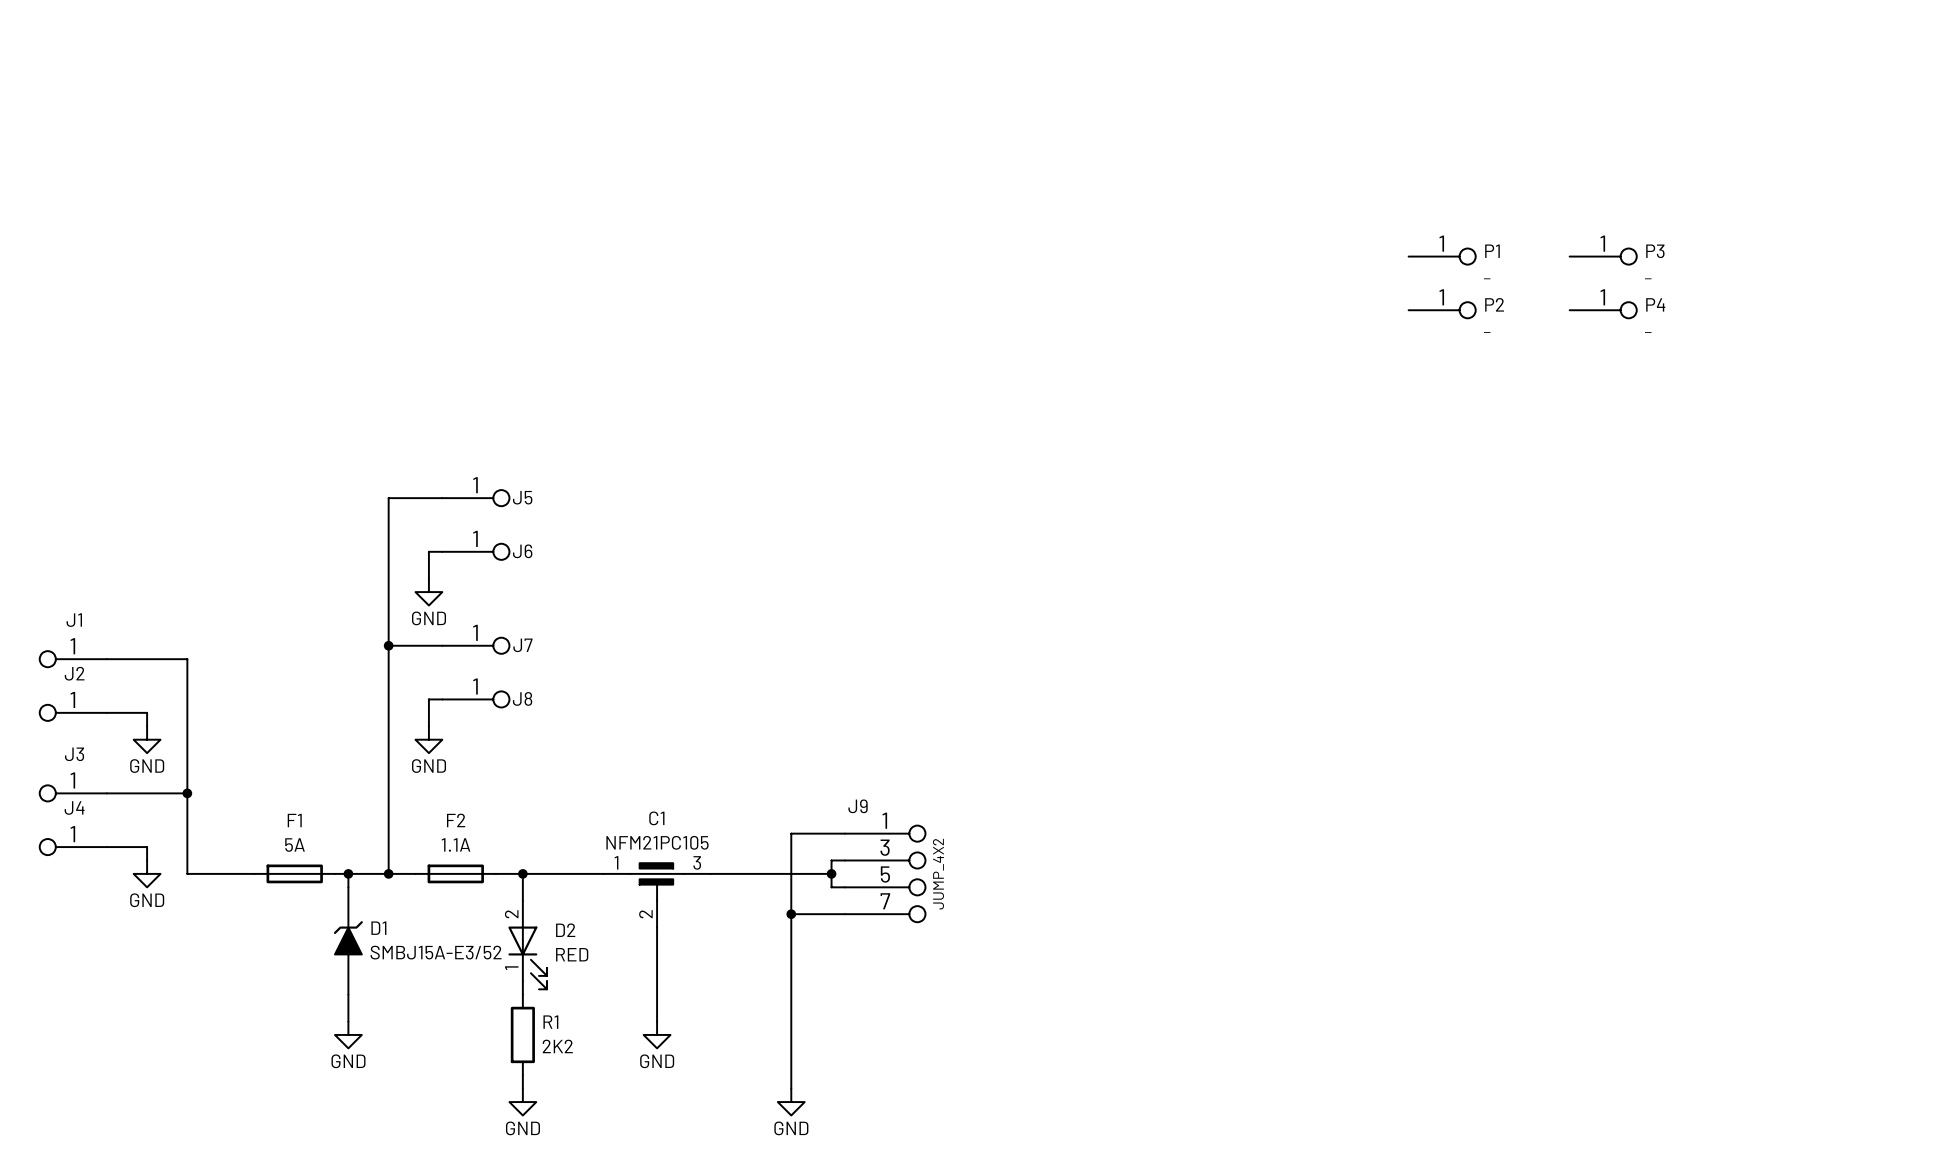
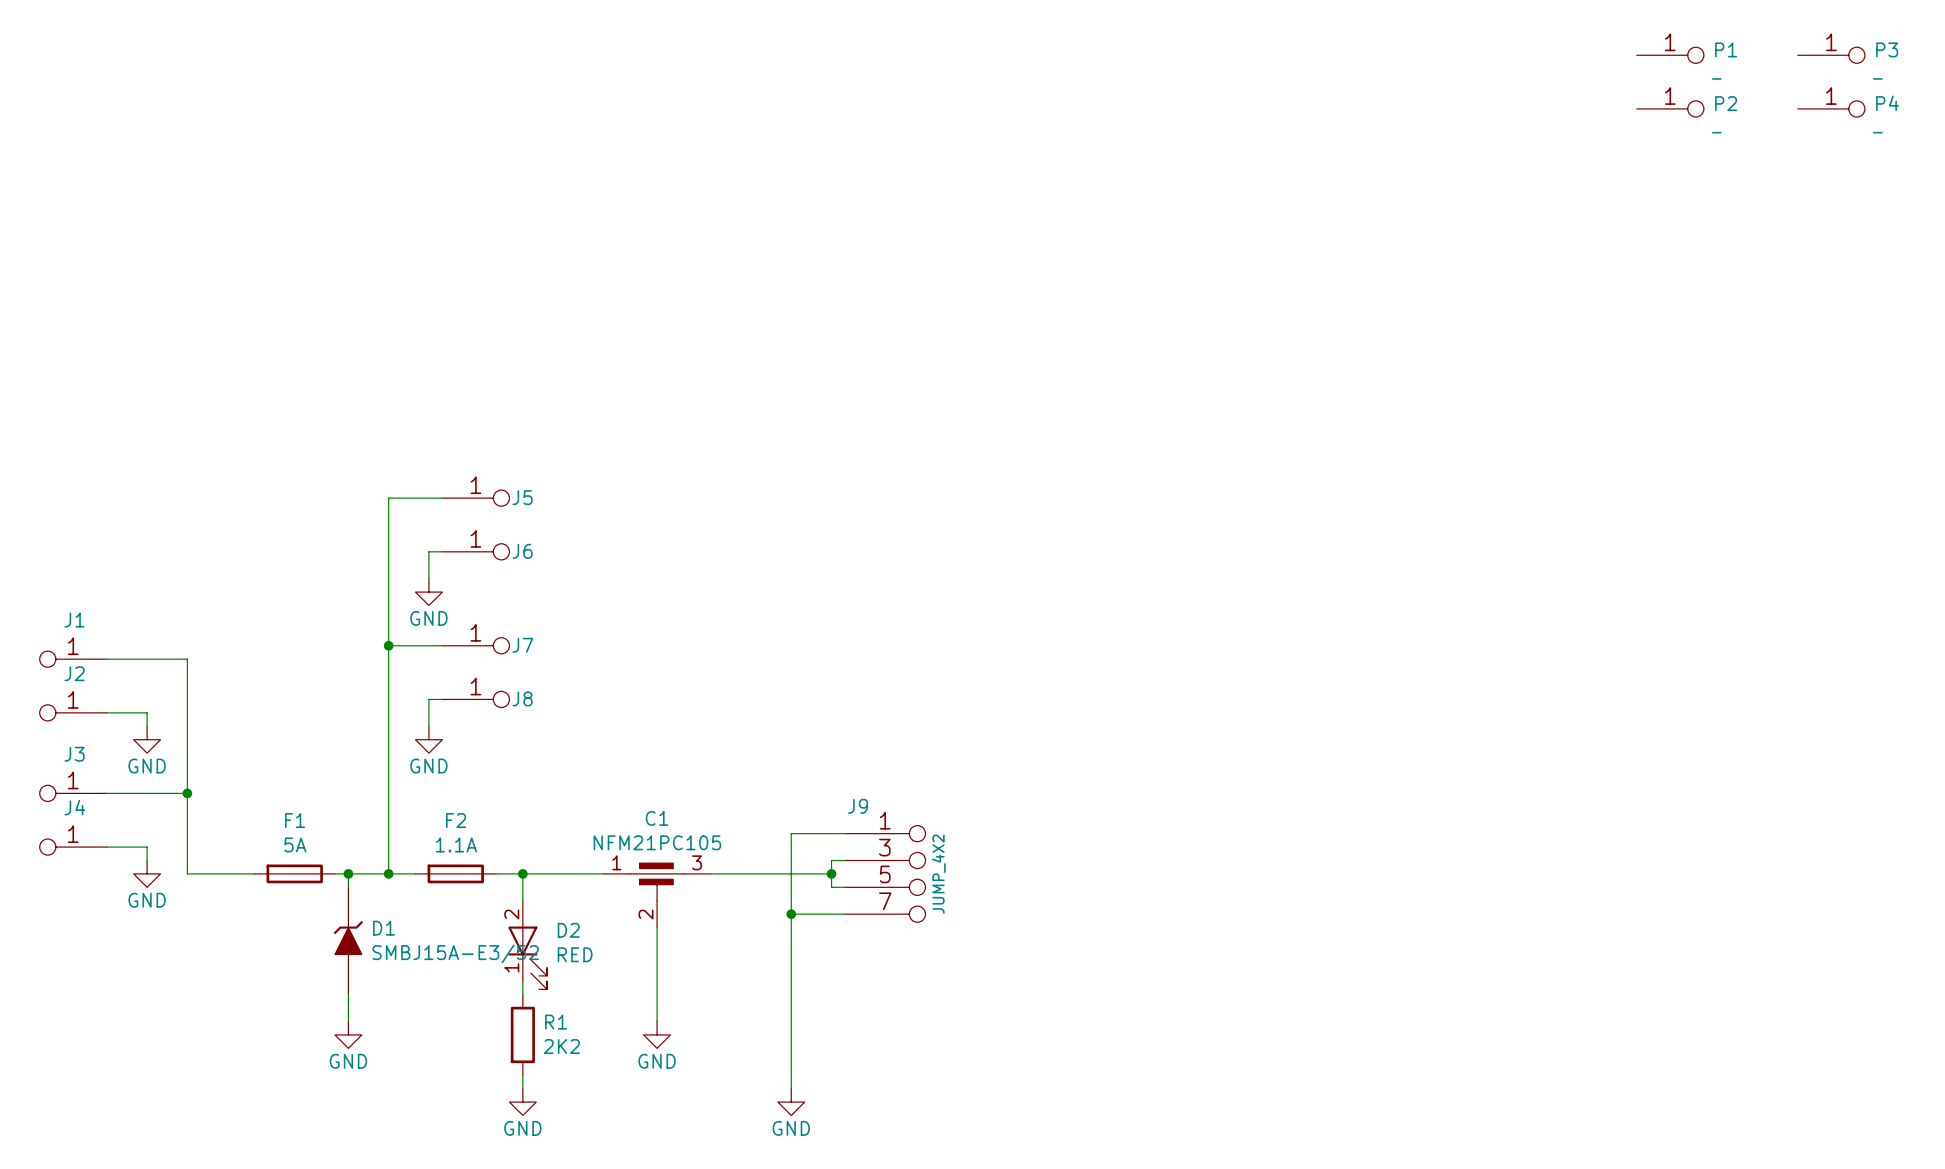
P1 position: (1442, 256) -> (1670, 55)
P3 position: (1603, 256) -> (1831, 55)
P2 position: (1442, 310) -> (1670, 108)
P4 position: (1603, 310) -> (1831, 108)

